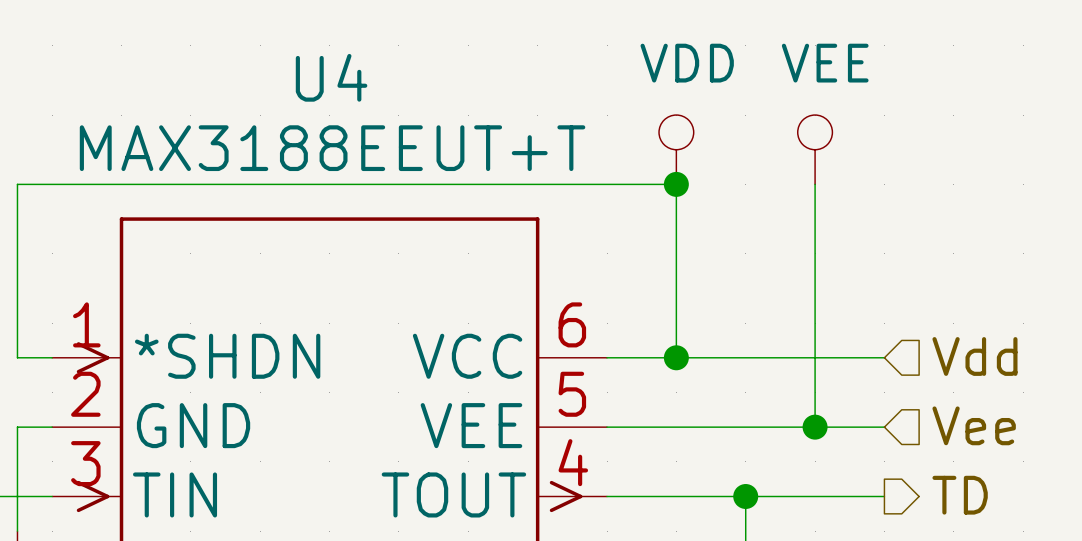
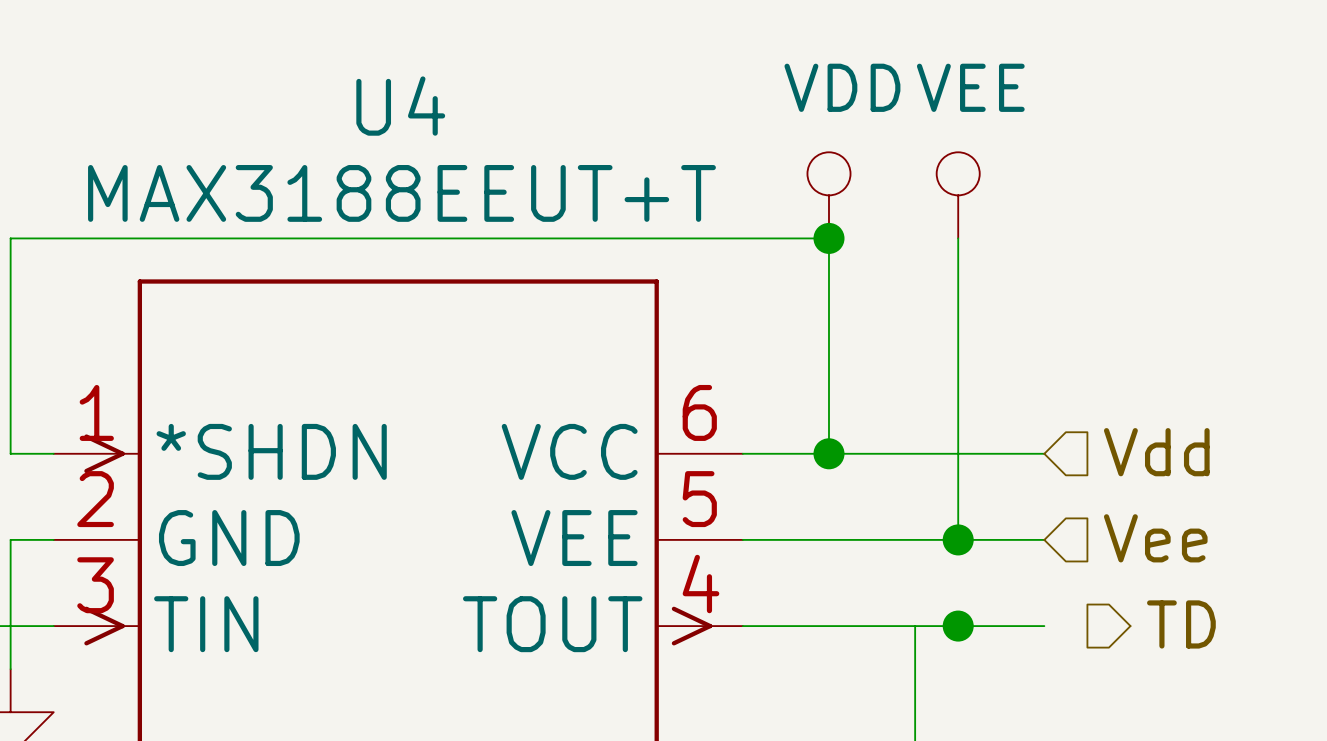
power symbol position: VEE (815, 149) -> VEE (958, 195)
wire: (815, 184) (815, 427) -> (958, 238) (958, 539)
hierarchical label position: Vdd (974, 356) -> Vdd (1156, 452)
wire: (849, 357) (884, 357) -> none
hierarchical label position: Vee (974, 425) -> Vee (1155, 538)
junction position: (815, 427) -> (958, 539)
wire: (849, 427) (884, 427) -> none
junction position: (745, 496) -> (958, 626)
wire: (849, 496) (884, 496) -> none

